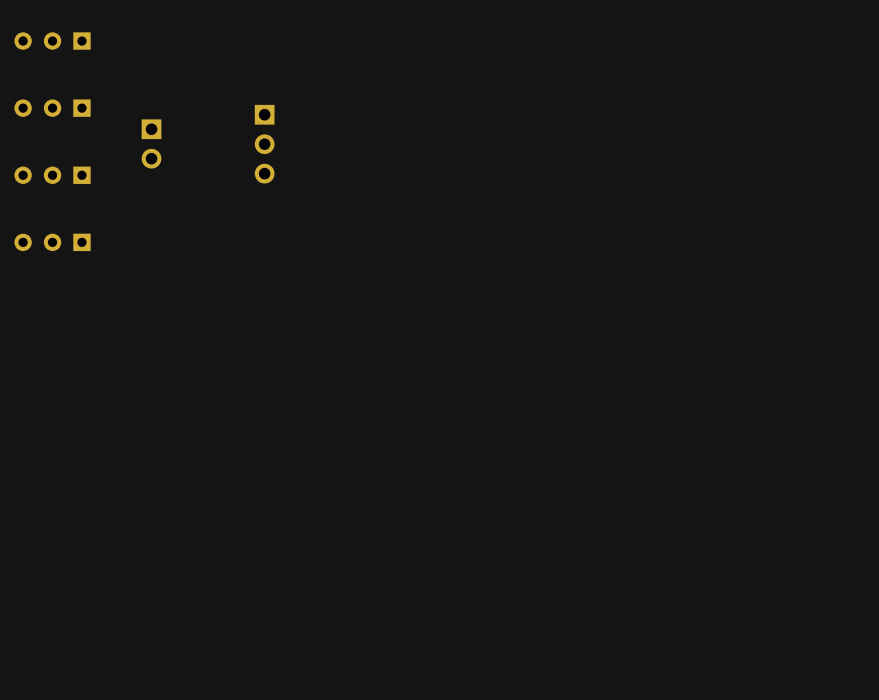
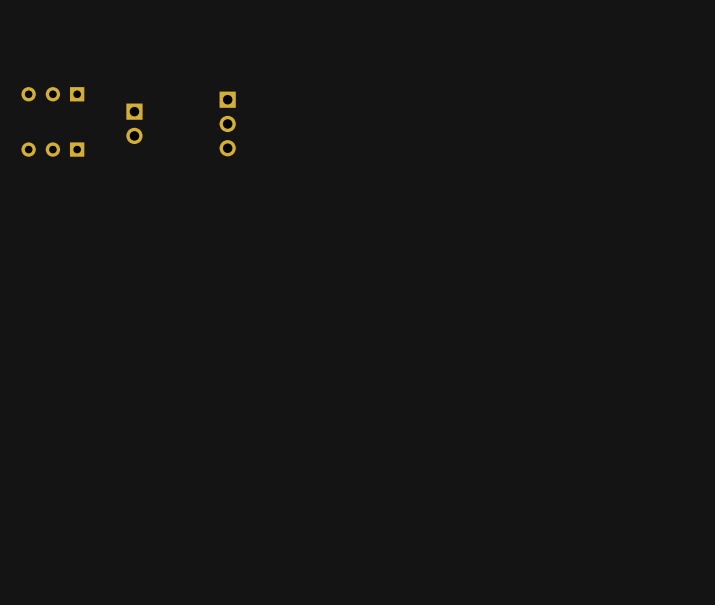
part: (52, 41) -> none
part: (52, 242) -> none

